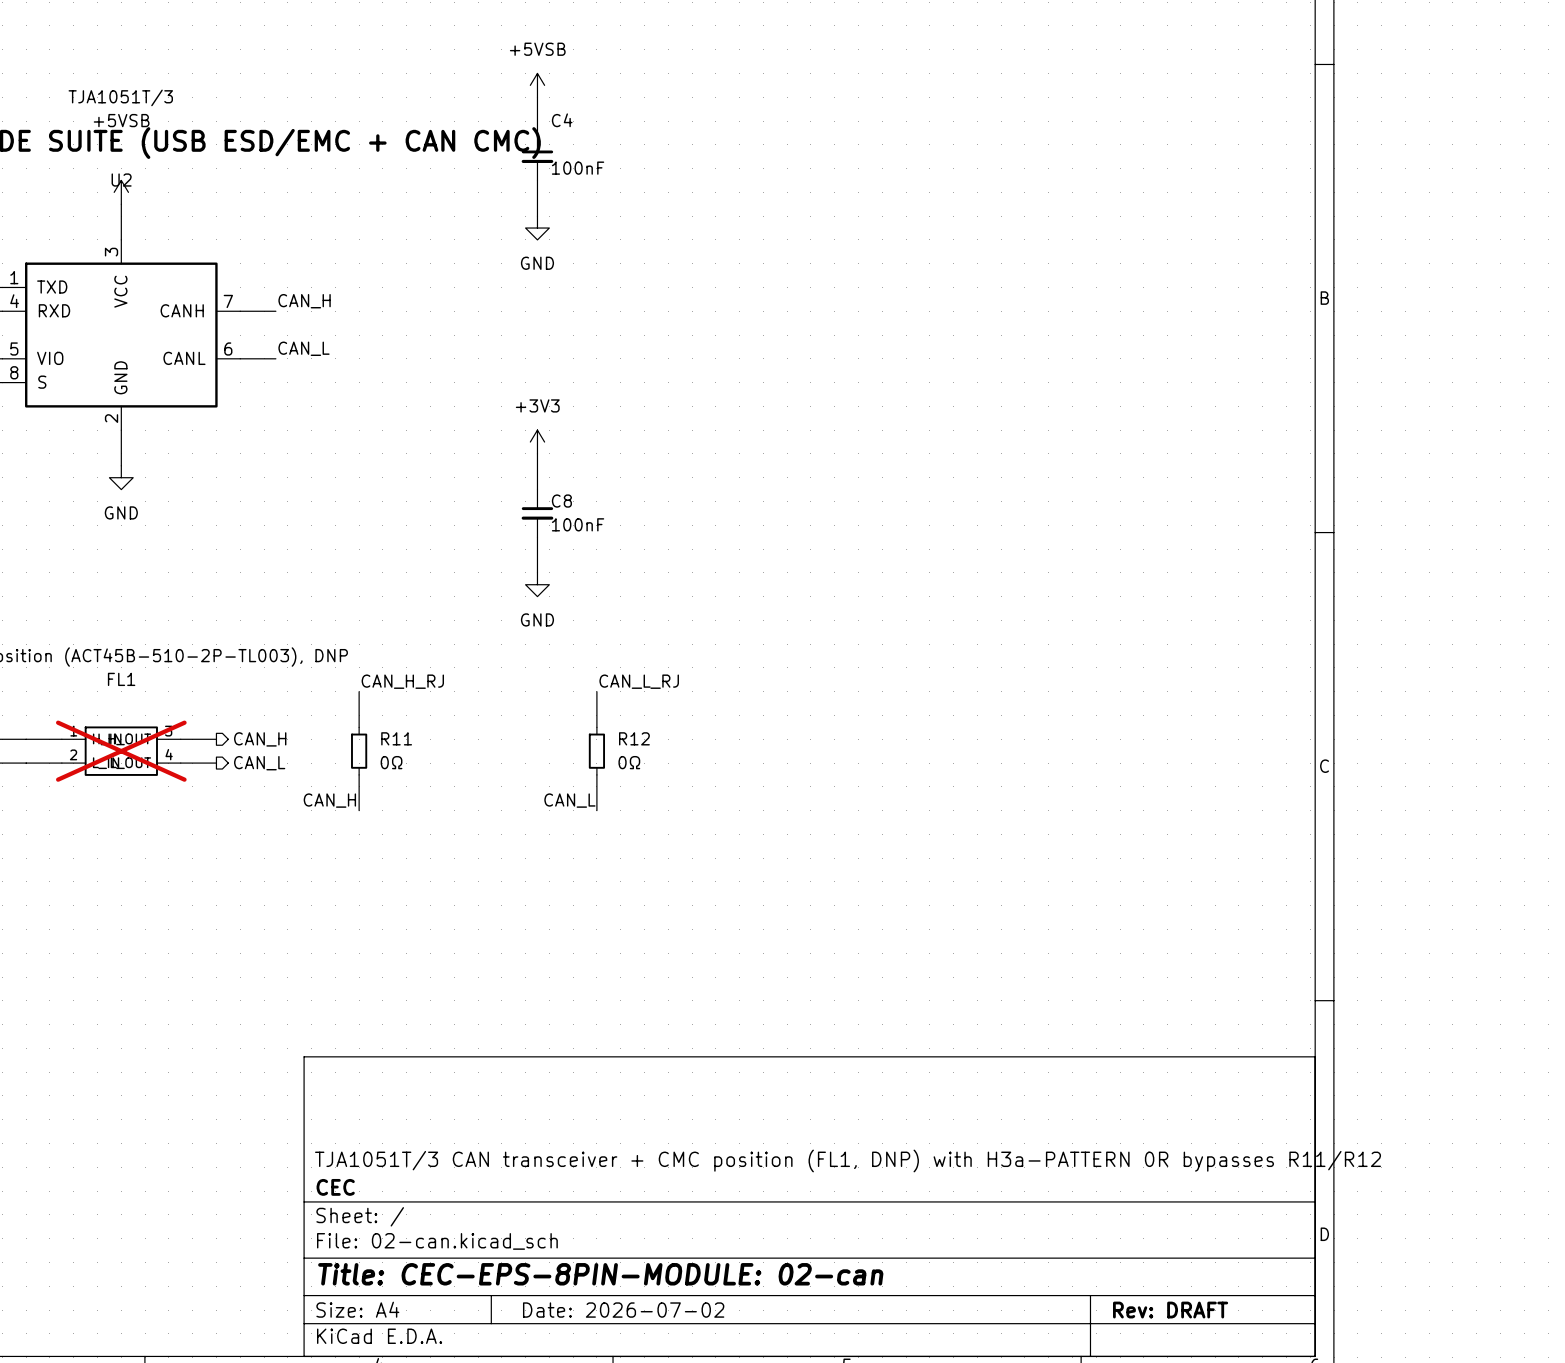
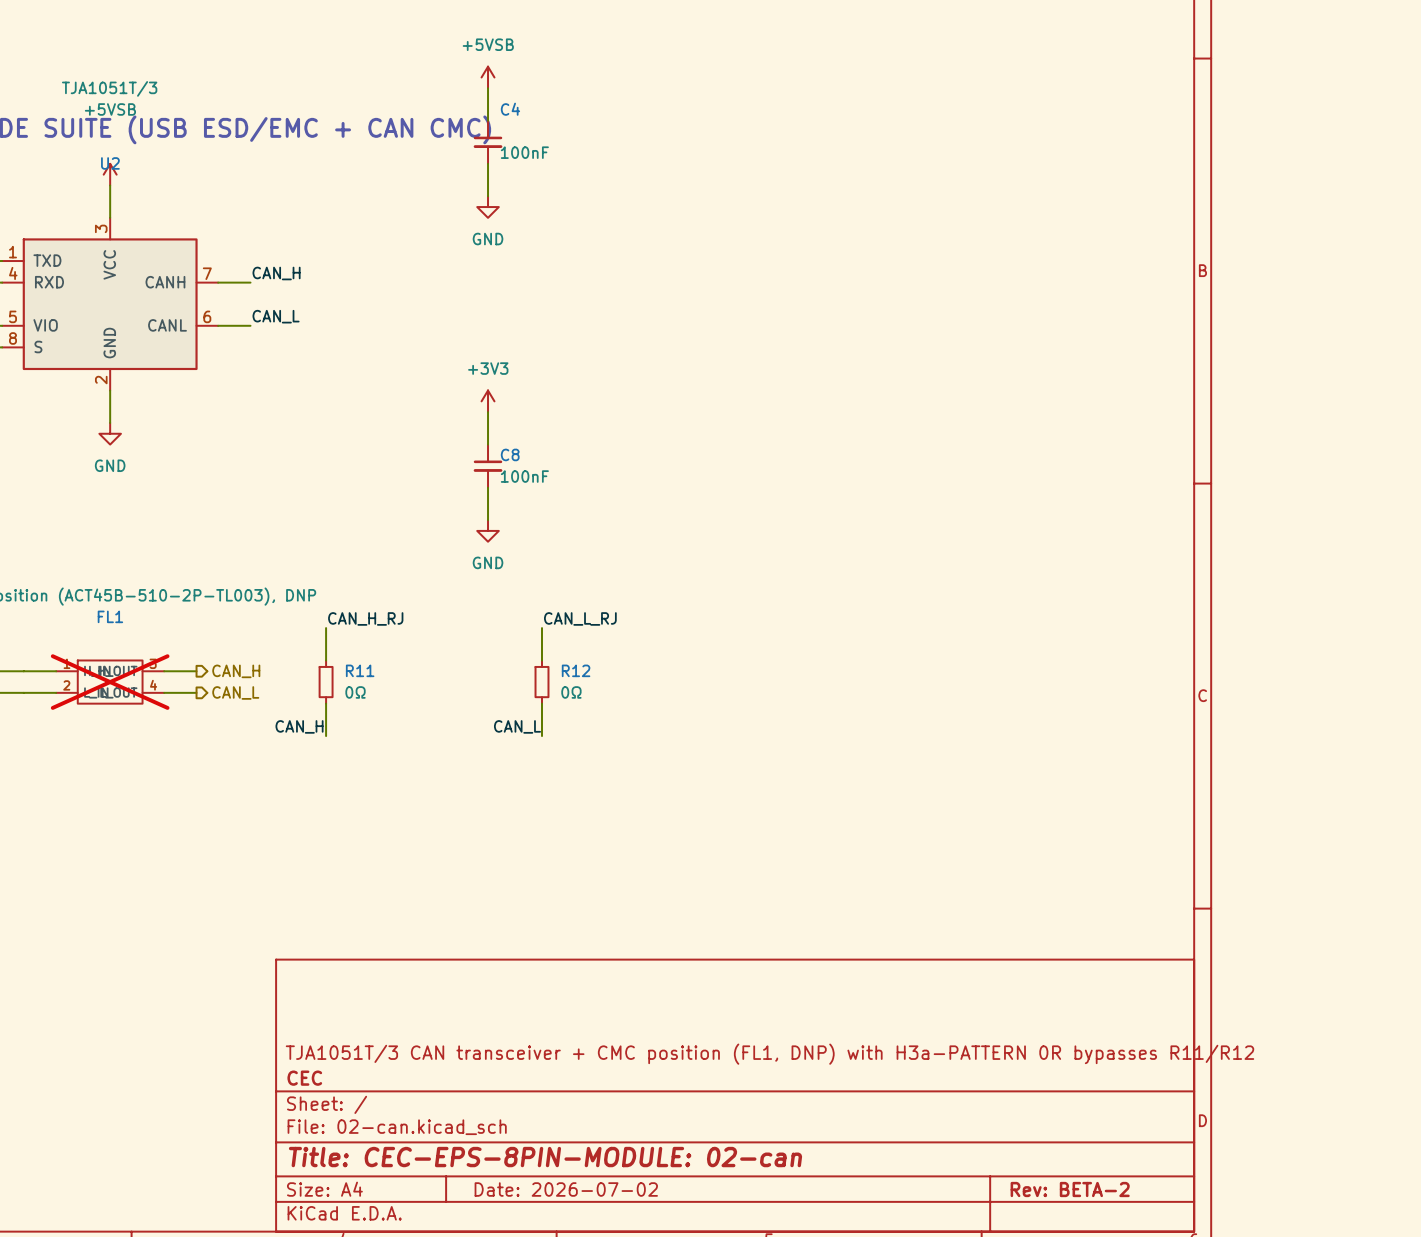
title block: Rev: DRAFT (1170, 1310) -> Rev: BETA-2 (1070, 1189)

